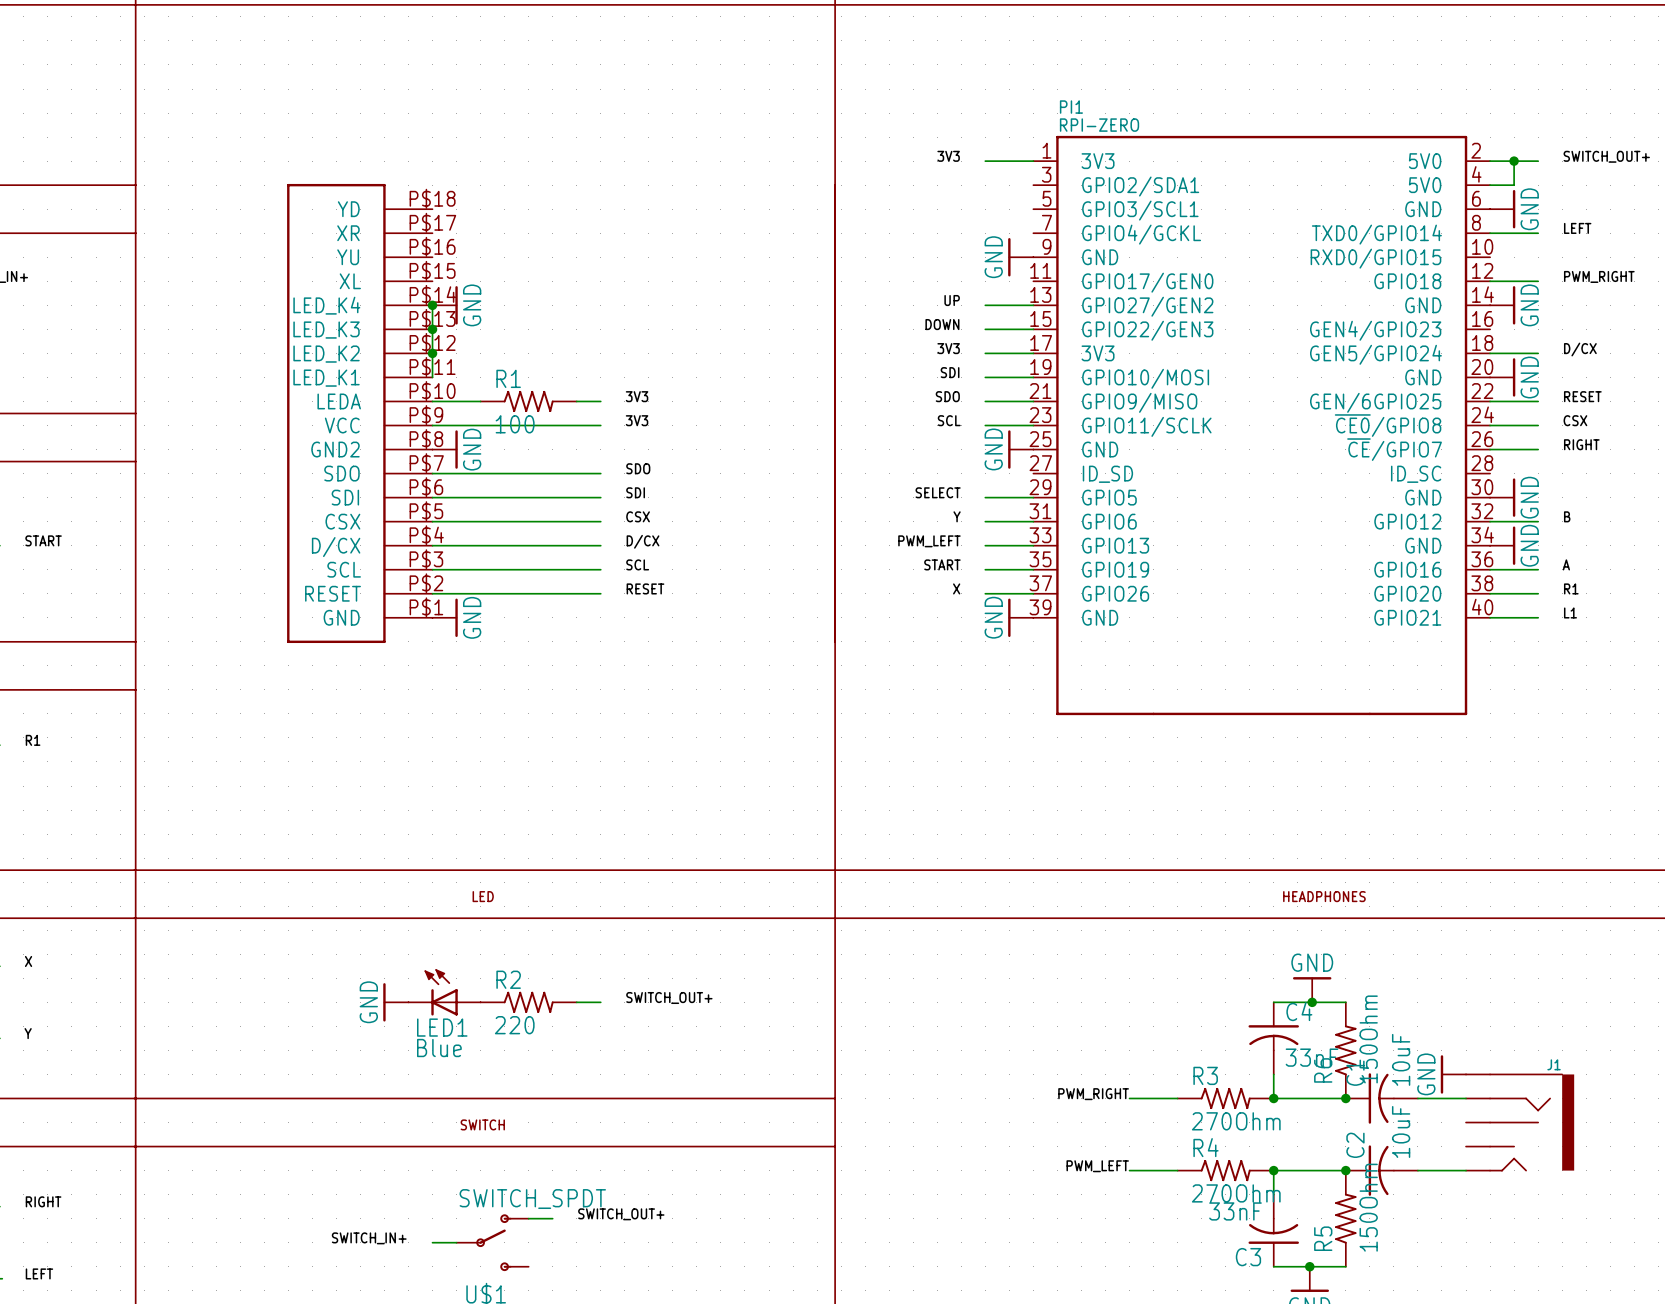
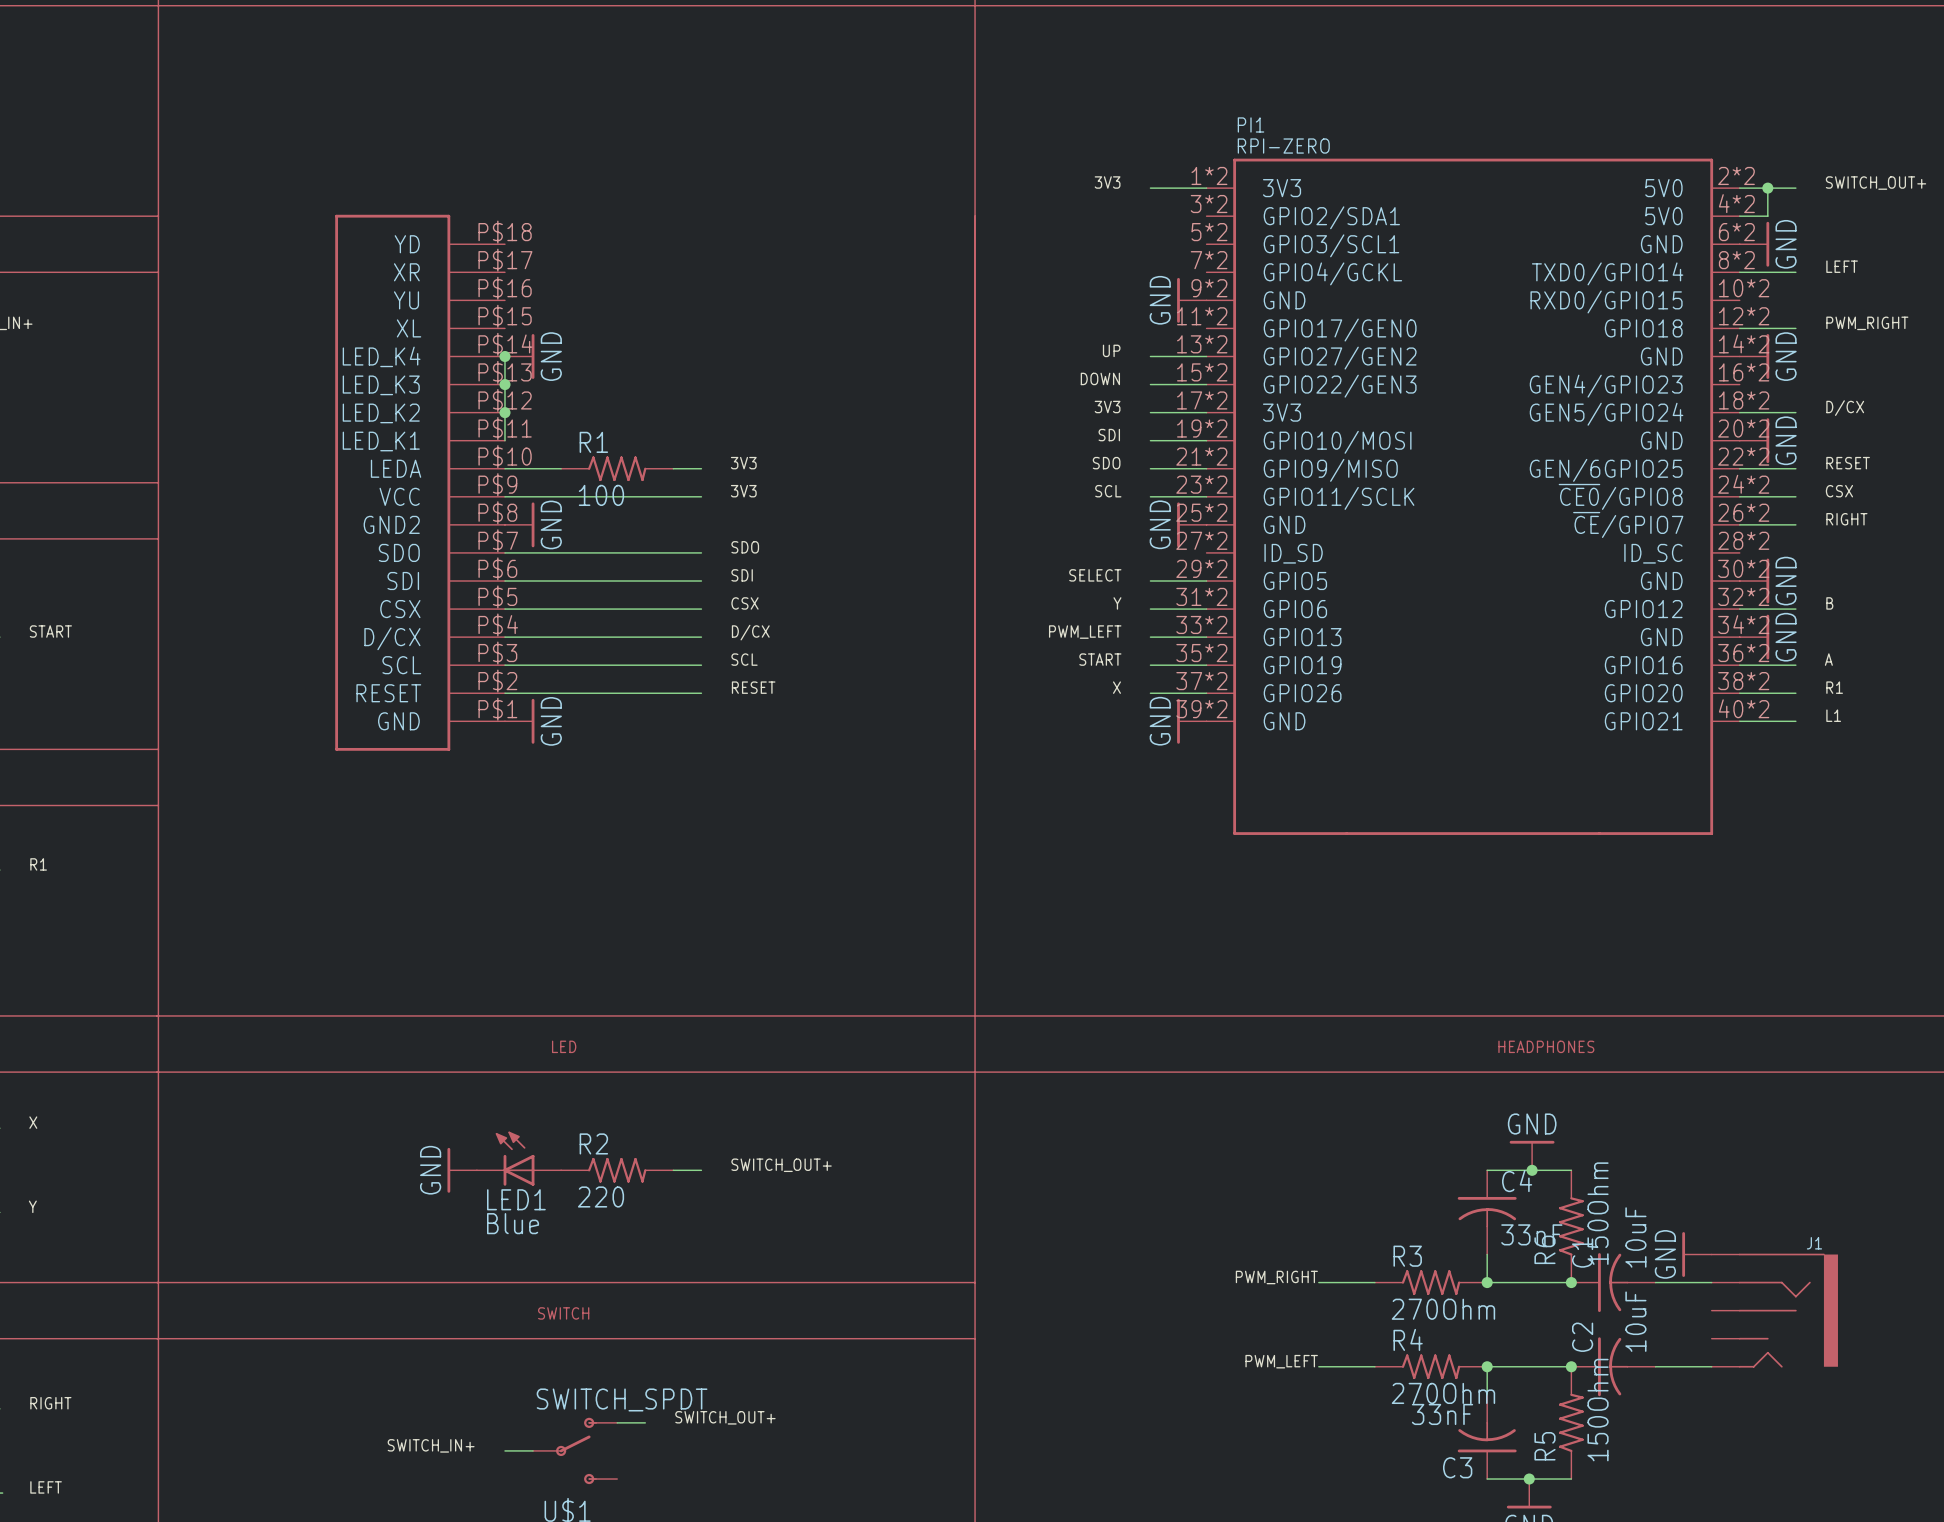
PI1 symbol: [1033, 135, 1491, 716] -> [1206, 158, 1740, 835]

